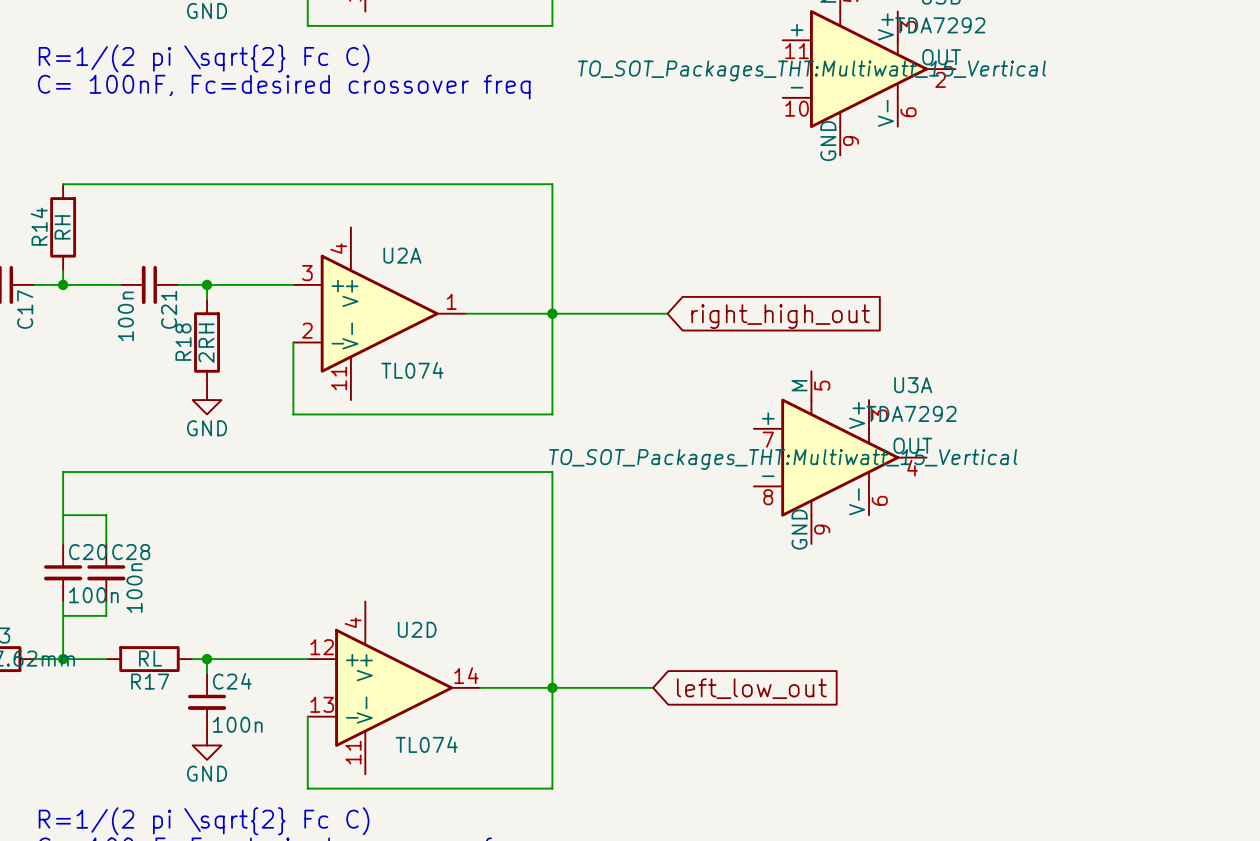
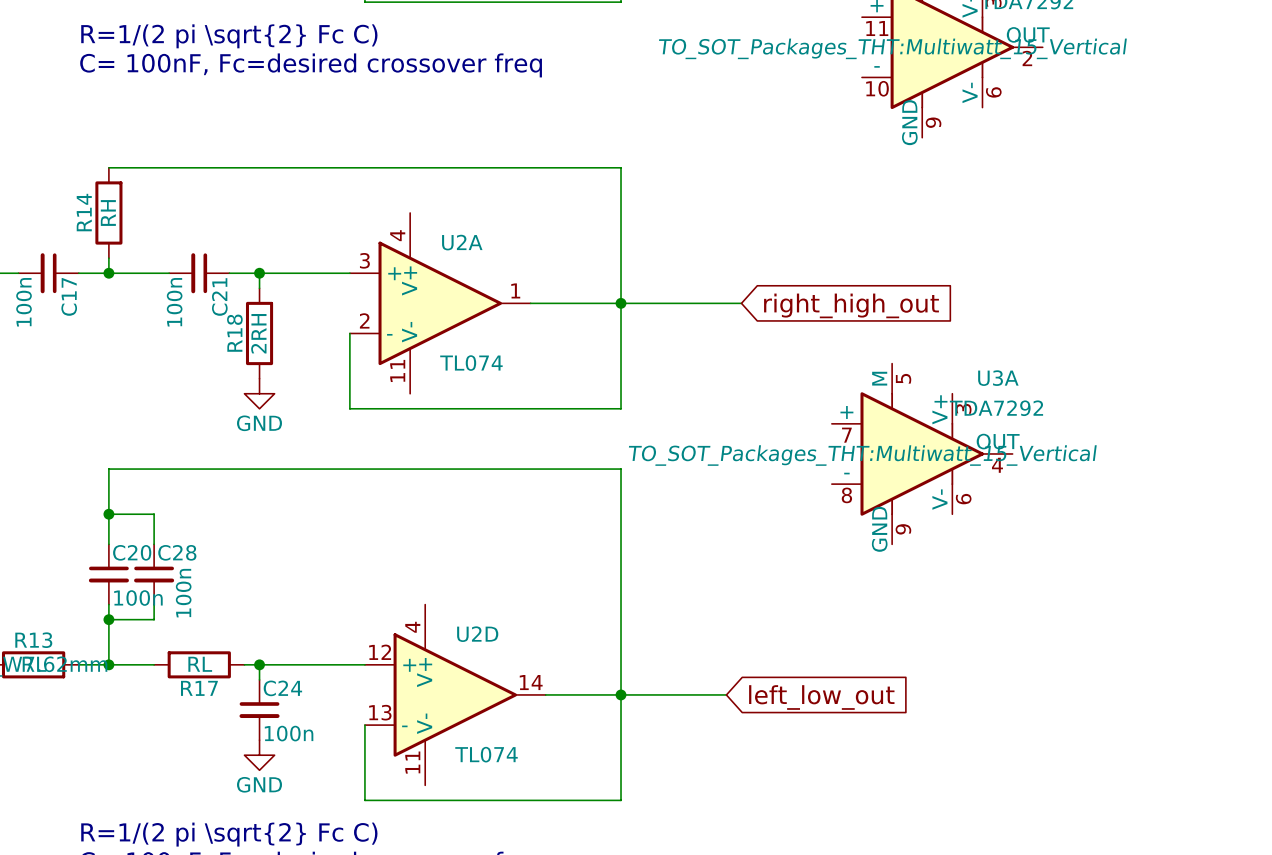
junction: none -> (108, 514)
junction: none -> (108, 619)

